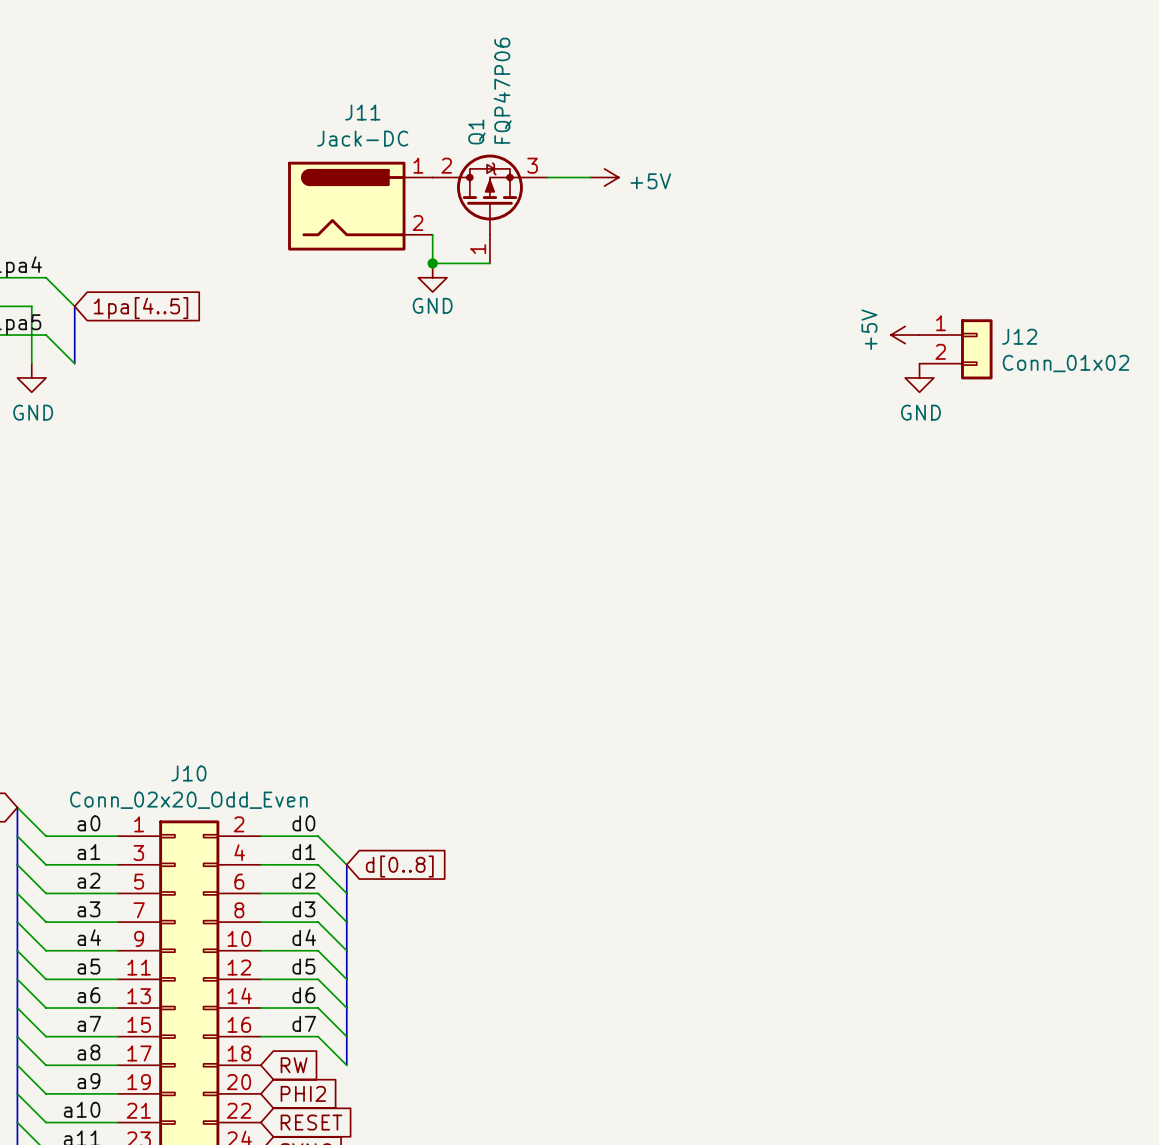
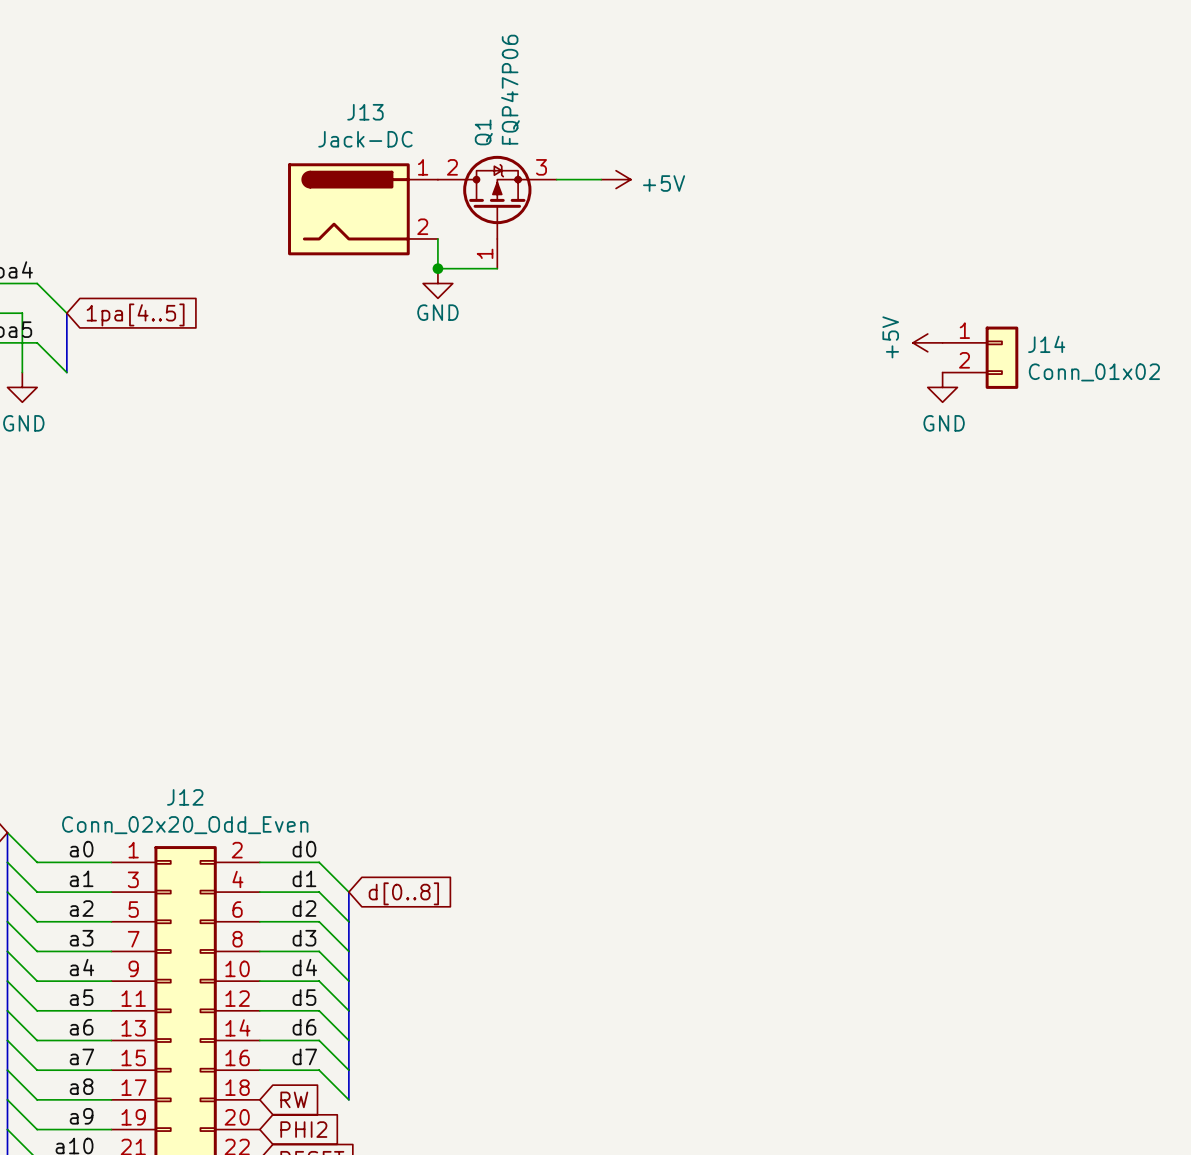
J11 name: J11 (362, 112) -> J13 (365, 112)
J12 name: J12 (1019, 336) -> J14 (1046, 344)
J10 name: J10 (188, 773) -> J12 (185, 797)

